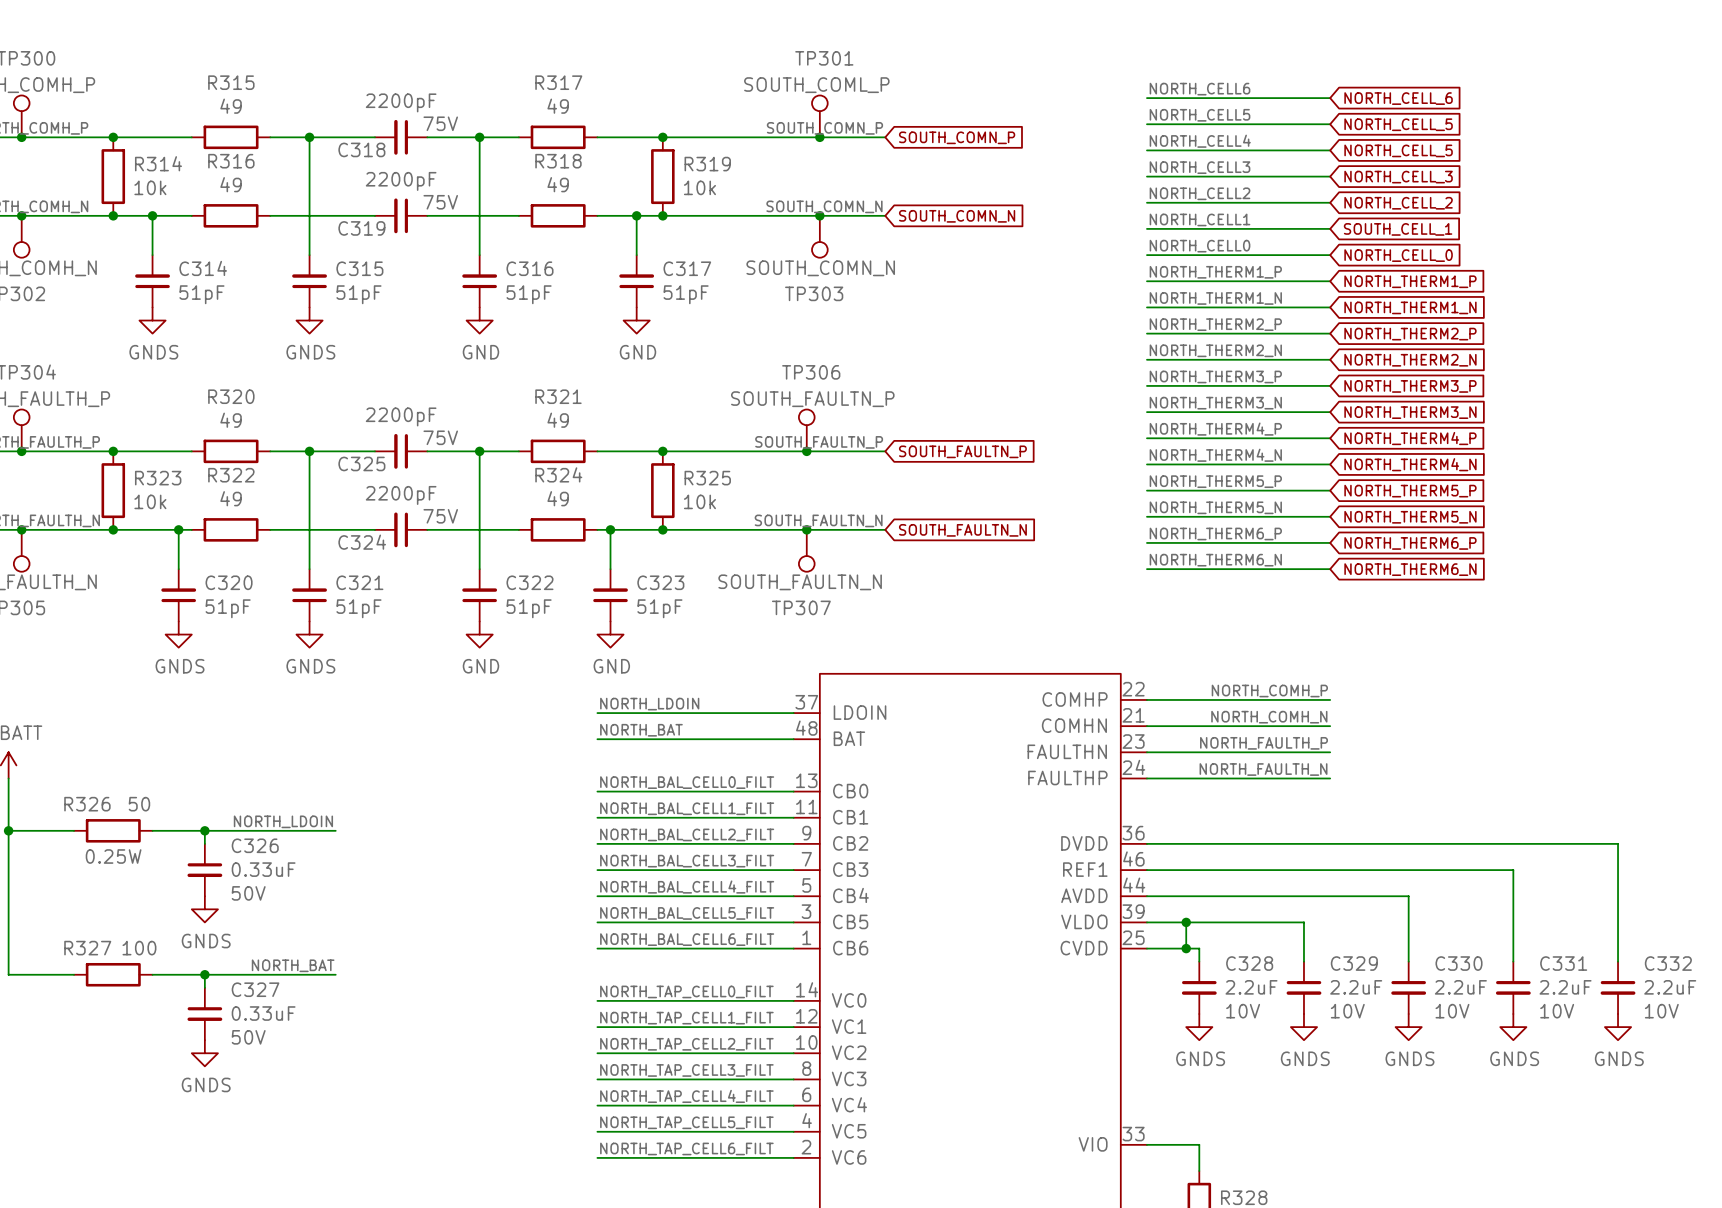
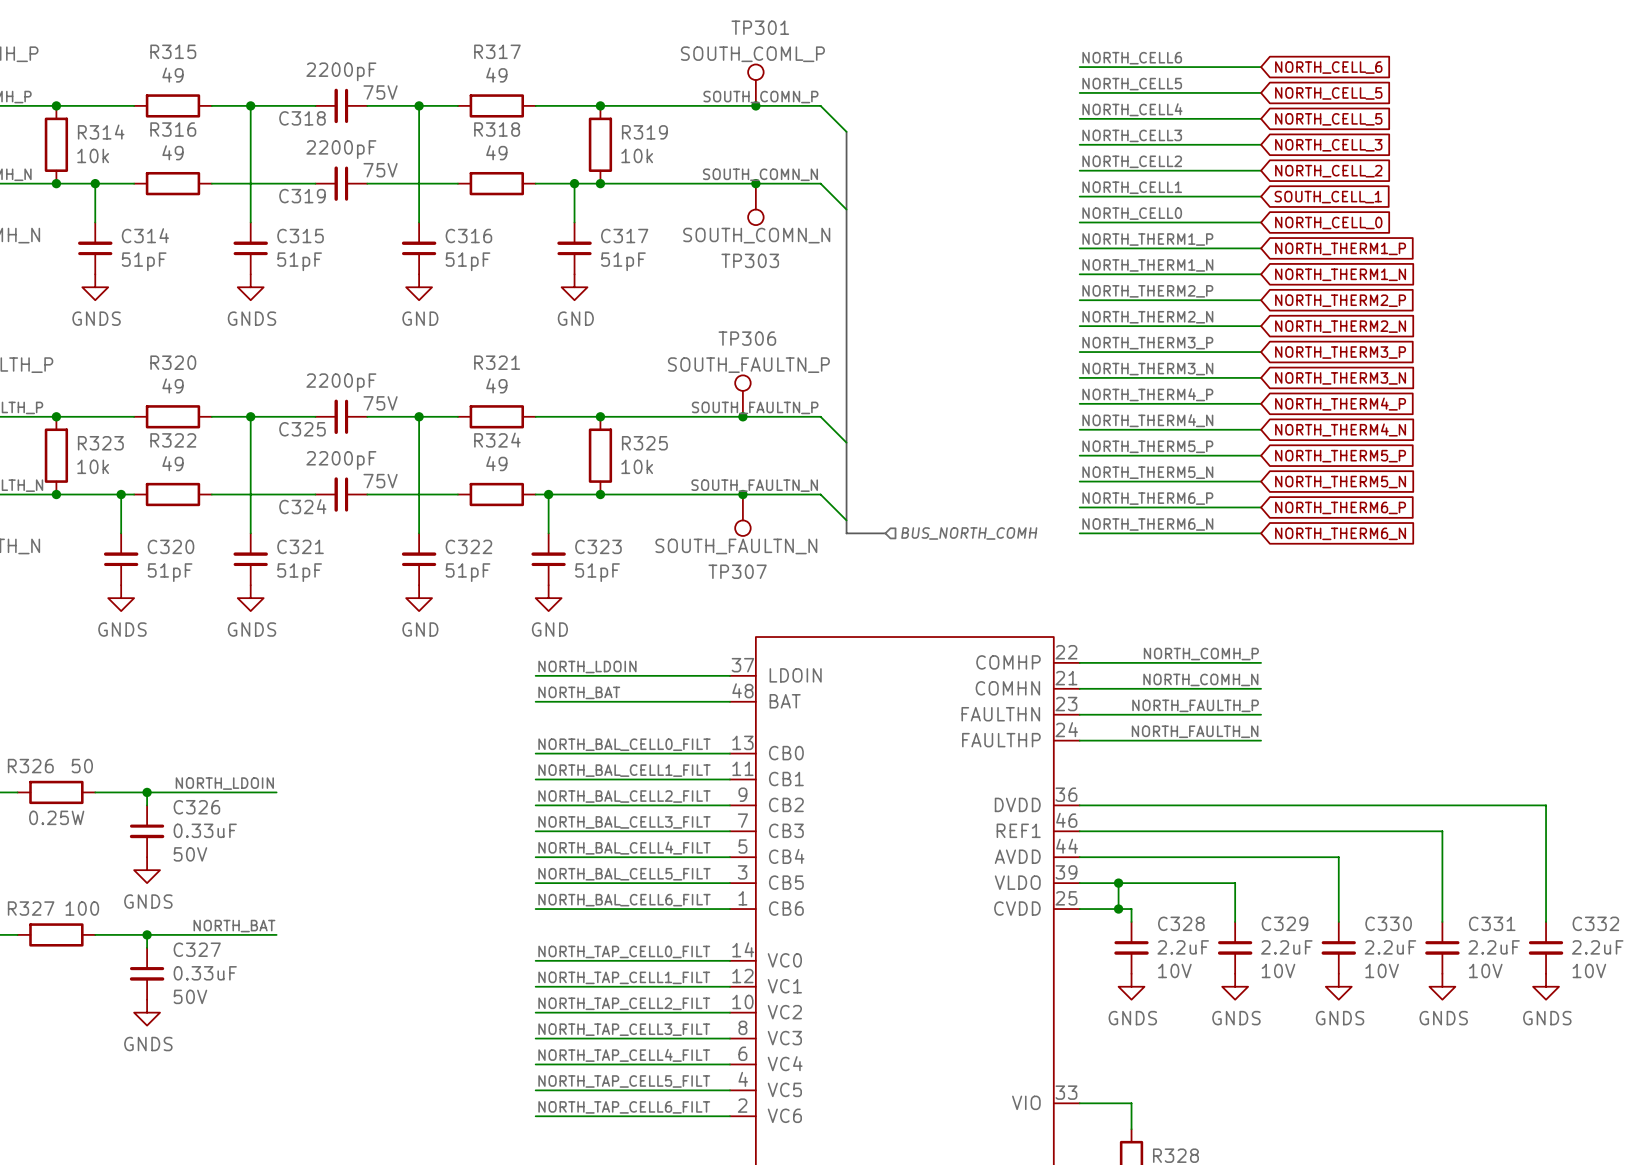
wire: none -> (820, 105) (846, 131)
global label: SOUTH_COMN_P (957, 137) -> none
bus: none -> (846, 131) (846, 533) (885, 533)
wire: none -> (820, 183) (846, 209)
global label: SOUTH_COMN_N (957, 216) -> none
wire: none -> (820, 416) (846, 442)
global label: SOUTH_FAULTN_P (962, 451) -> none
wire: none -> (820, 494) (846, 520)
global label: SOUTH_FAULTN_N (962, 530) -> none
hierarchical label: none -> BUS_NORTH_COMH (969, 533)

